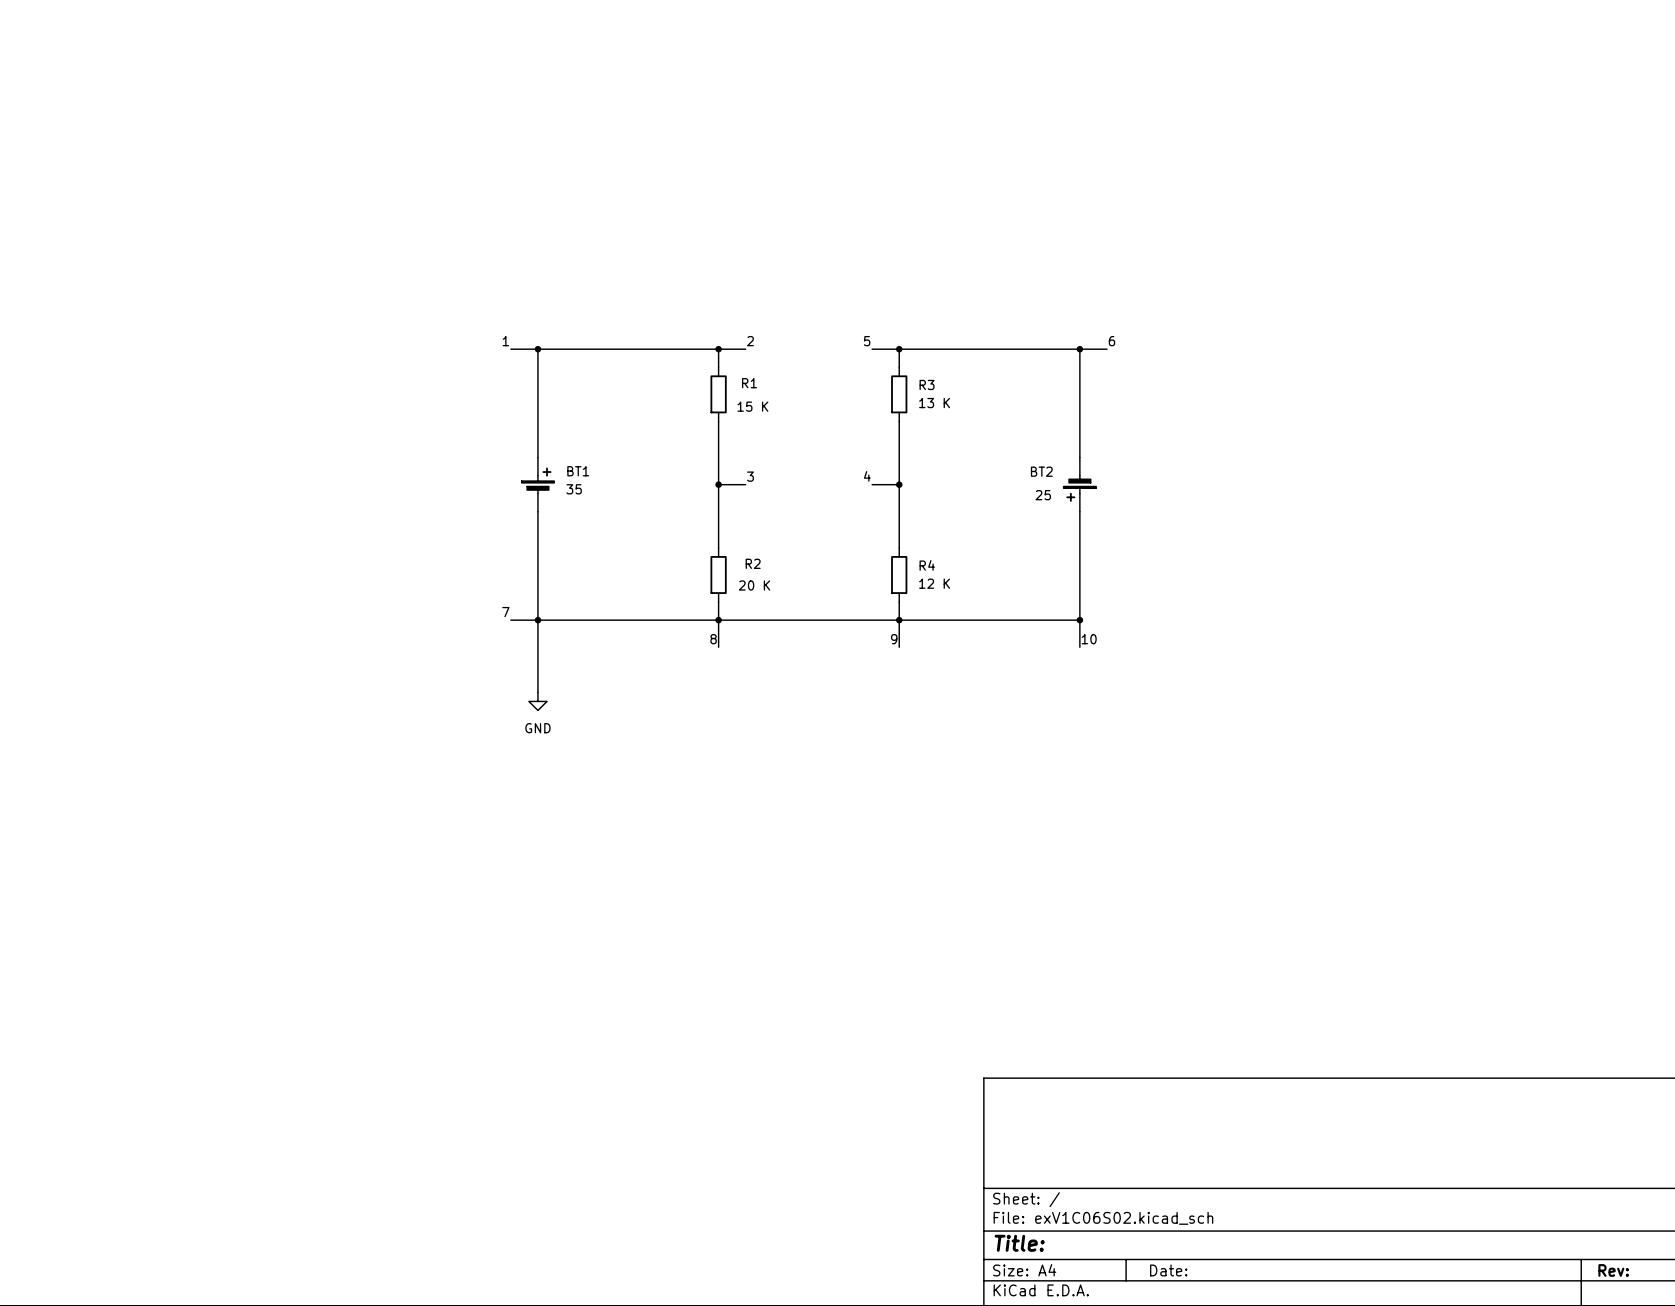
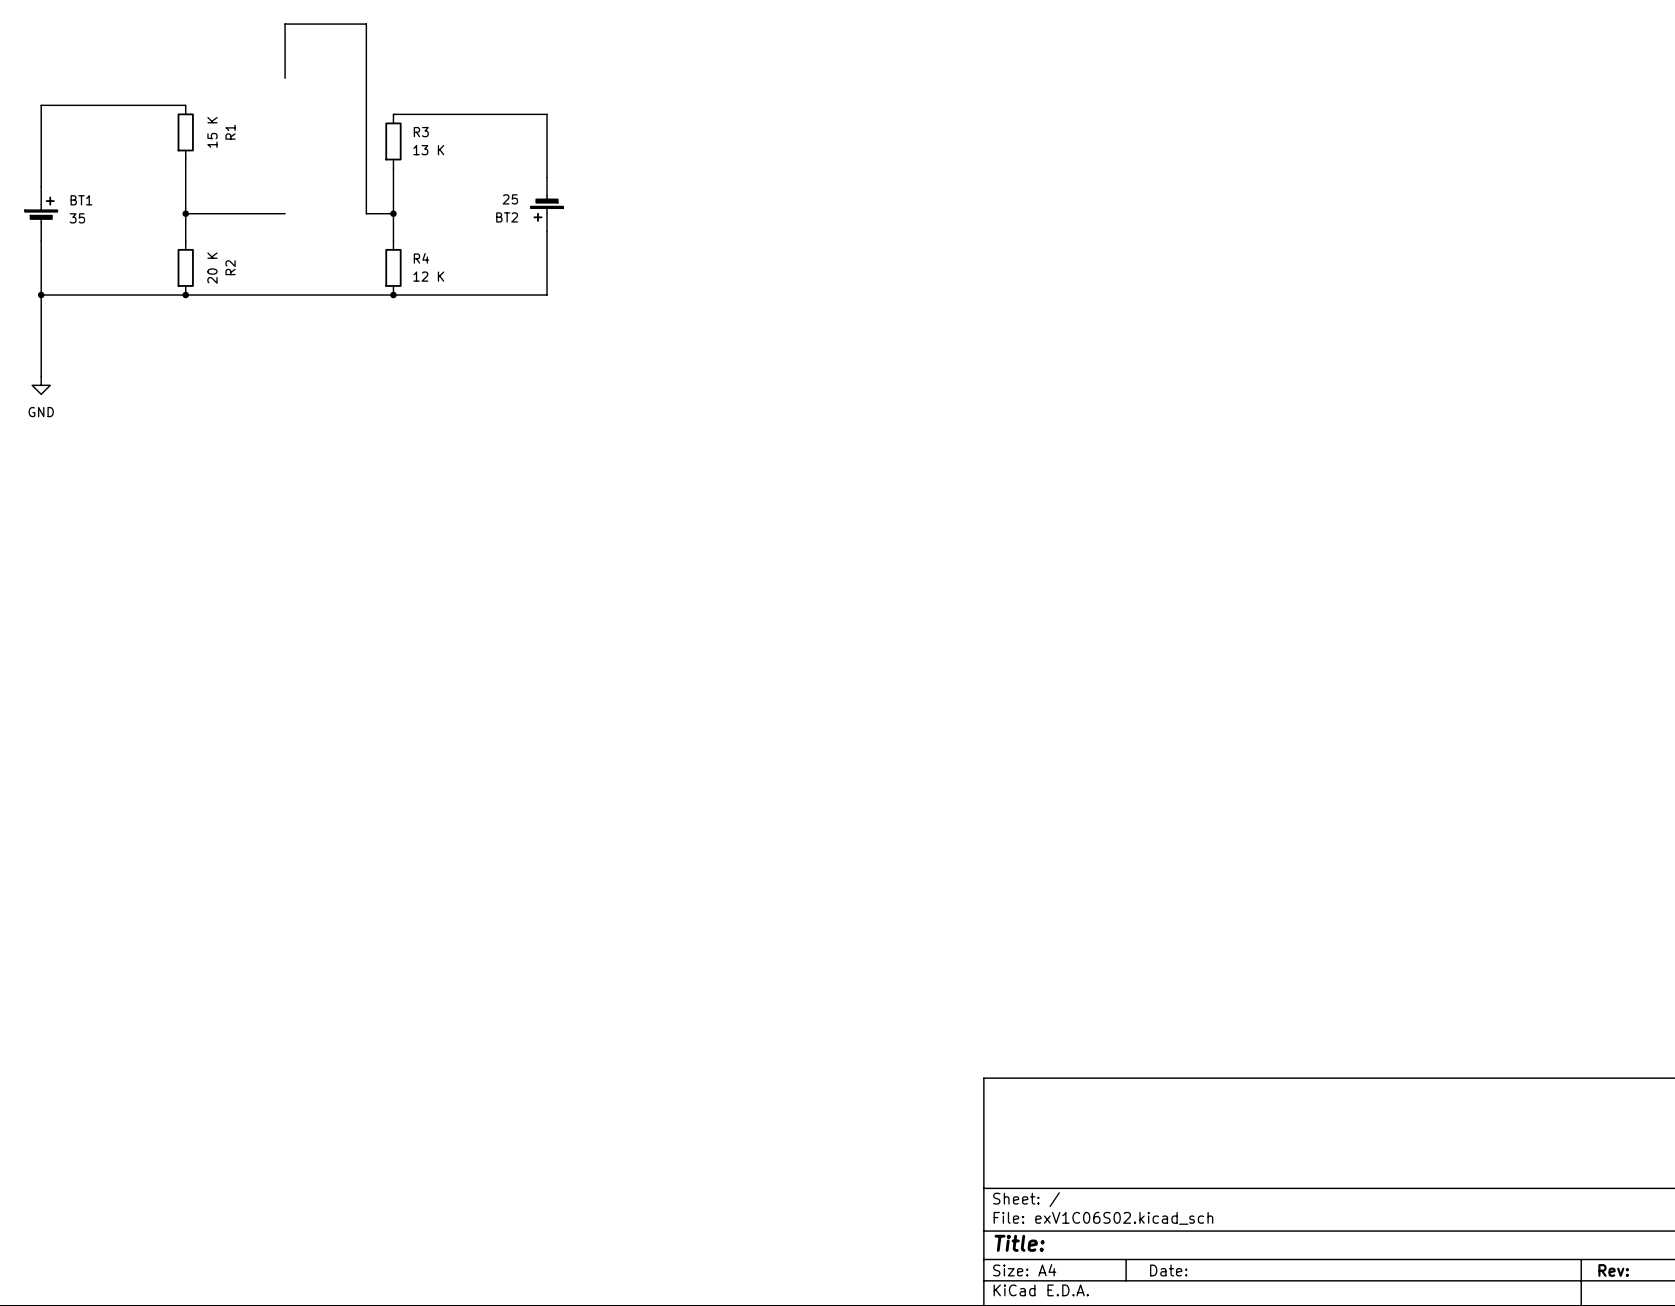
wire: none -> (285, 78) (285, 24) (366, 24) (366, 213) (393, 213)
wire: none -> (185, 105) (41, 105) (41, 186)
wire: none -> (393, 114) (546, 114) (546, 177)
wire: none -> (185, 159) (185, 240)
wire: none -> (393, 168) (393, 240)
wire: none -> (185, 213) (285, 213)
junction: none -> (185, 213)
junction: none -> (393, 213)
wire: none -> (546, 231) (546, 295) (41, 295)
wire: none -> (41, 240) (41, 376)
junction: none -> (41, 295)
junction: none -> (185, 295)
junction: none -> (393, 295)
label: 1 (505, 341) -> none
label: 2 (750, 341) -> none
label: 5 (867, 341) -> none
label: 6 (1111, 341) -> none
wire: (510, 349) (745, 349) -> none
wire: (537, 349) (537, 457) -> none
junction: (537, 349) -> none
wire: (718, 349) (718, 367) -> none
junction: (718, 349) -> none
wire: (872, 349) (1106, 349) -> none
wire: (899, 349) (899, 367) -> none
junction: (899, 349) -> none
wire: (1079, 349) (1079, 457) -> none
junction: (1079, 349) -> none
R1 name rotation: 0° (749, 383) -> 90° counterclockwise (230, 132)
power symbol: none -> GND (41, 385)
R1 position: (718, 394) -> (185, 132)
R3 position: (899, 394) -> (393, 141)
R1 value rotation: 0° (752, 406) -> 90° counterclockwise (212, 132)
wire: (718, 421) (718, 547) -> none
wire: (899, 421) (899, 547) -> none
BT2 name position: BT2 (1041, 471) -> BT2 (507, 217)
label: 3 (750, 476) -> none
label: 4 (867, 476) -> none
BT1 position: (537, 484) -> (41, 213)
wire: (718, 484) (745, 484) -> none
junction: (718, 484) -> none
wire: (872, 484) (899, 484) -> none
junction: (899, 484) -> none
BT2 position: (1079, 484) -> (546, 204)
BT2 value position: 25 (1043, 495) -> 25 (510, 199)
wire: (537, 511) (537, 692) -> none
wire: (1079, 511) (1079, 647) -> none
R2 name rotation: 0° (753, 563) -> 90° counterclockwise (230, 267)
R2 position: (718, 574) -> (185, 267)
R4 position: (899, 574) -> (393, 267)
R2 value rotation: 0° (754, 585) -> 90° counterclockwise (212, 268)
wire: (718, 602) (718, 647) -> none
wire: (899, 602) (899, 647) -> none
label: 7 (505, 612) -> none
wire: (510, 620) (1079, 620) -> none
junction: (537, 620) -> none
junction: (718, 620) -> none
junction: (899, 620) -> none
junction: (1079, 620) -> none
label: 8 (713, 639) -> none
label: 9 (894, 639) -> none
label: 10 (1089, 639) -> none
power symbol: GND (537, 701) -> none

